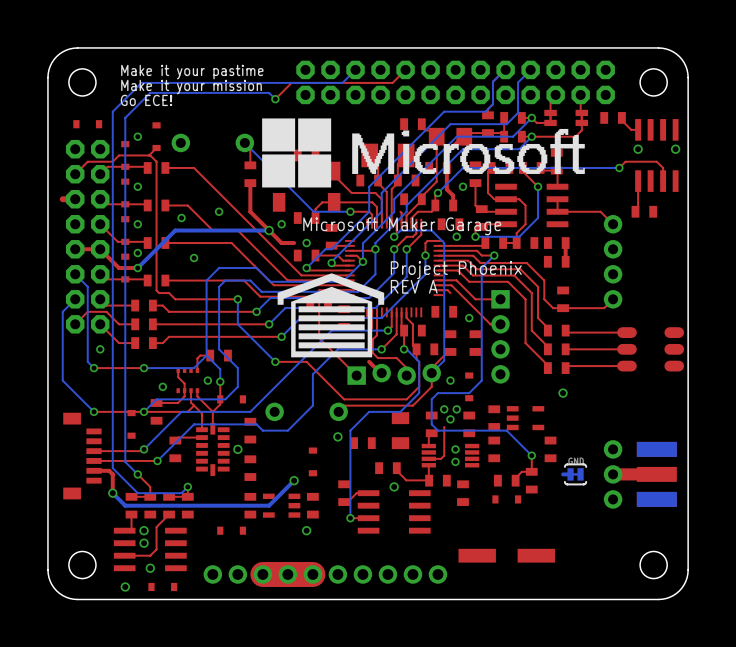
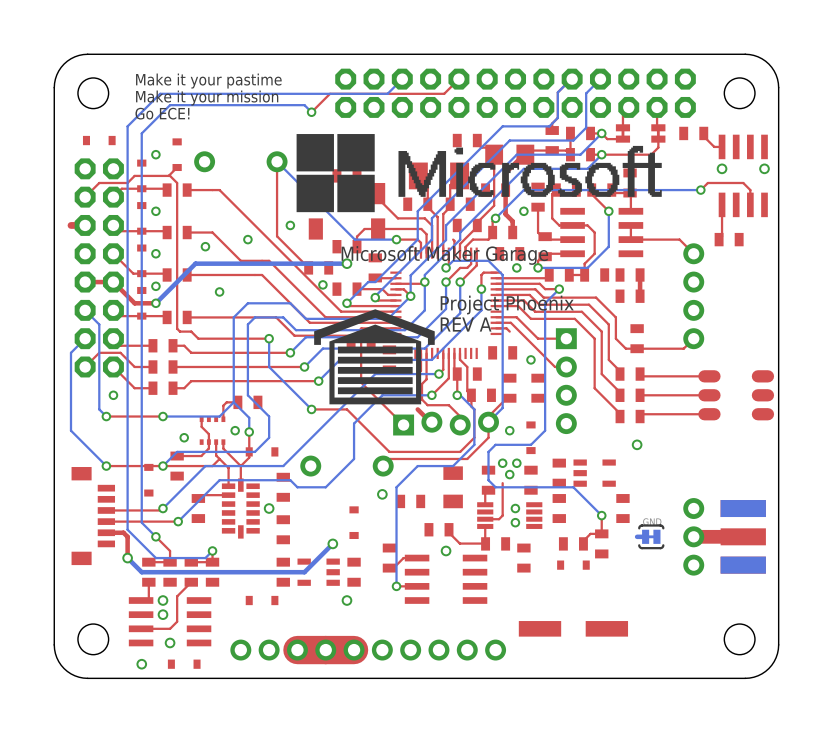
top track: none -> (277, 161) (277, 236) (308, 267)
top track: (250, 148) (250, 165) -> none
part rotation: 0° (250, 174) -> 90° clockwise (318, 267)
part position: (250, 174) -> (318, 267)
top track: (250, 183) (250, 211) (281, 243) (294, 243) -> none
via: none -> (290, 225)
via: (281, 224) -> none
bottom track: (269, 230) (175, 230) (172, 233) -> (346, 263) (195, 263)
via position: (269, 230) -> (346, 263)
via: (306, 243) -> none
via: none -> (322, 284)

